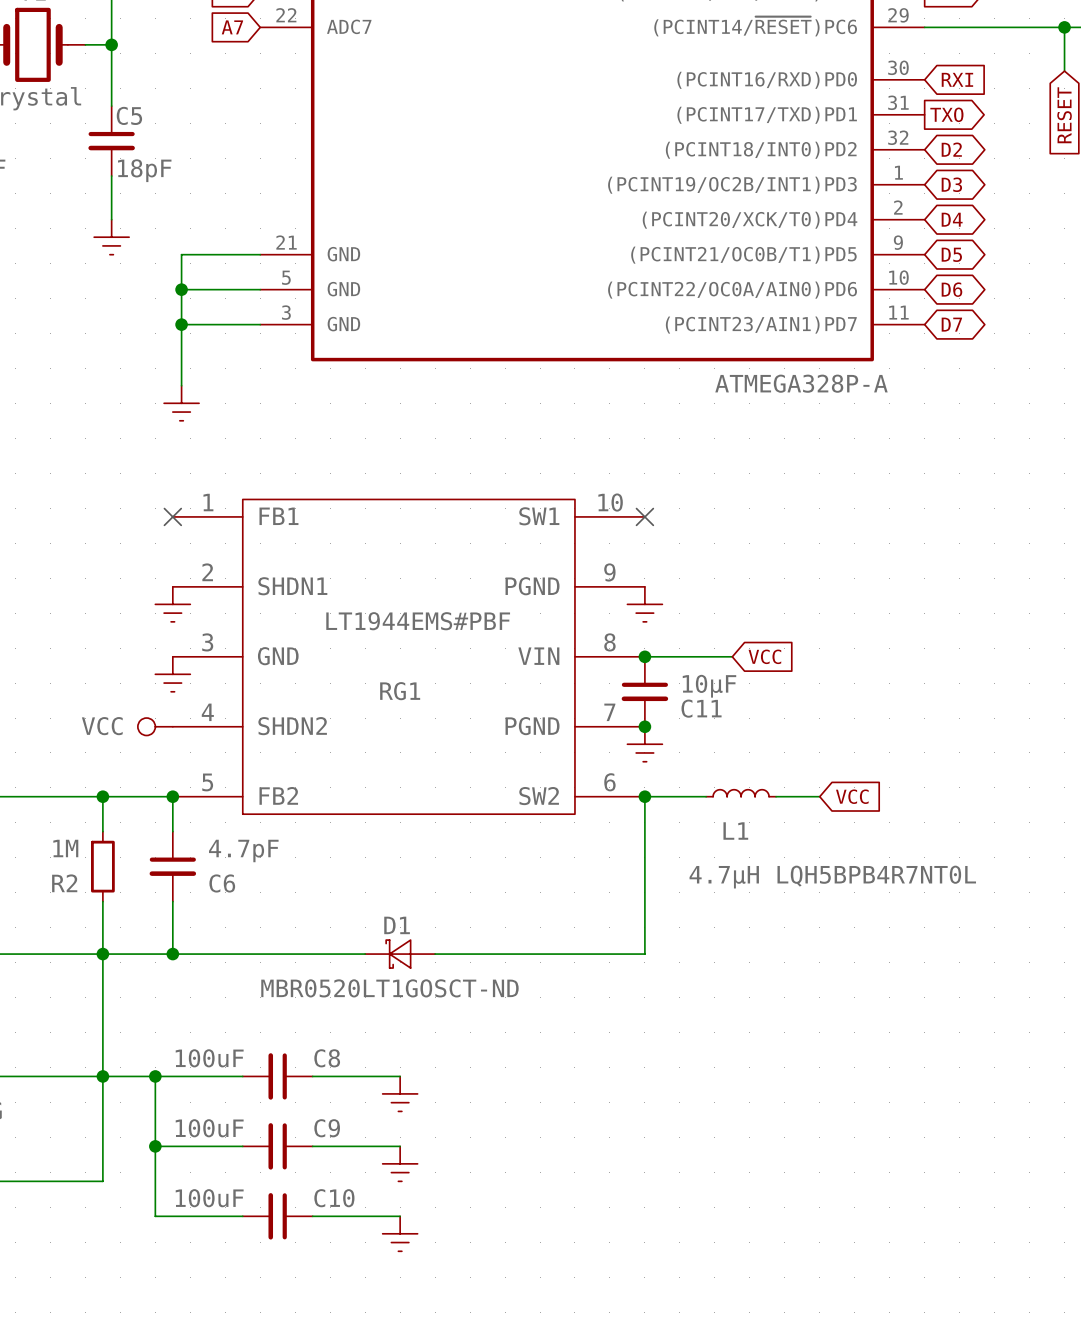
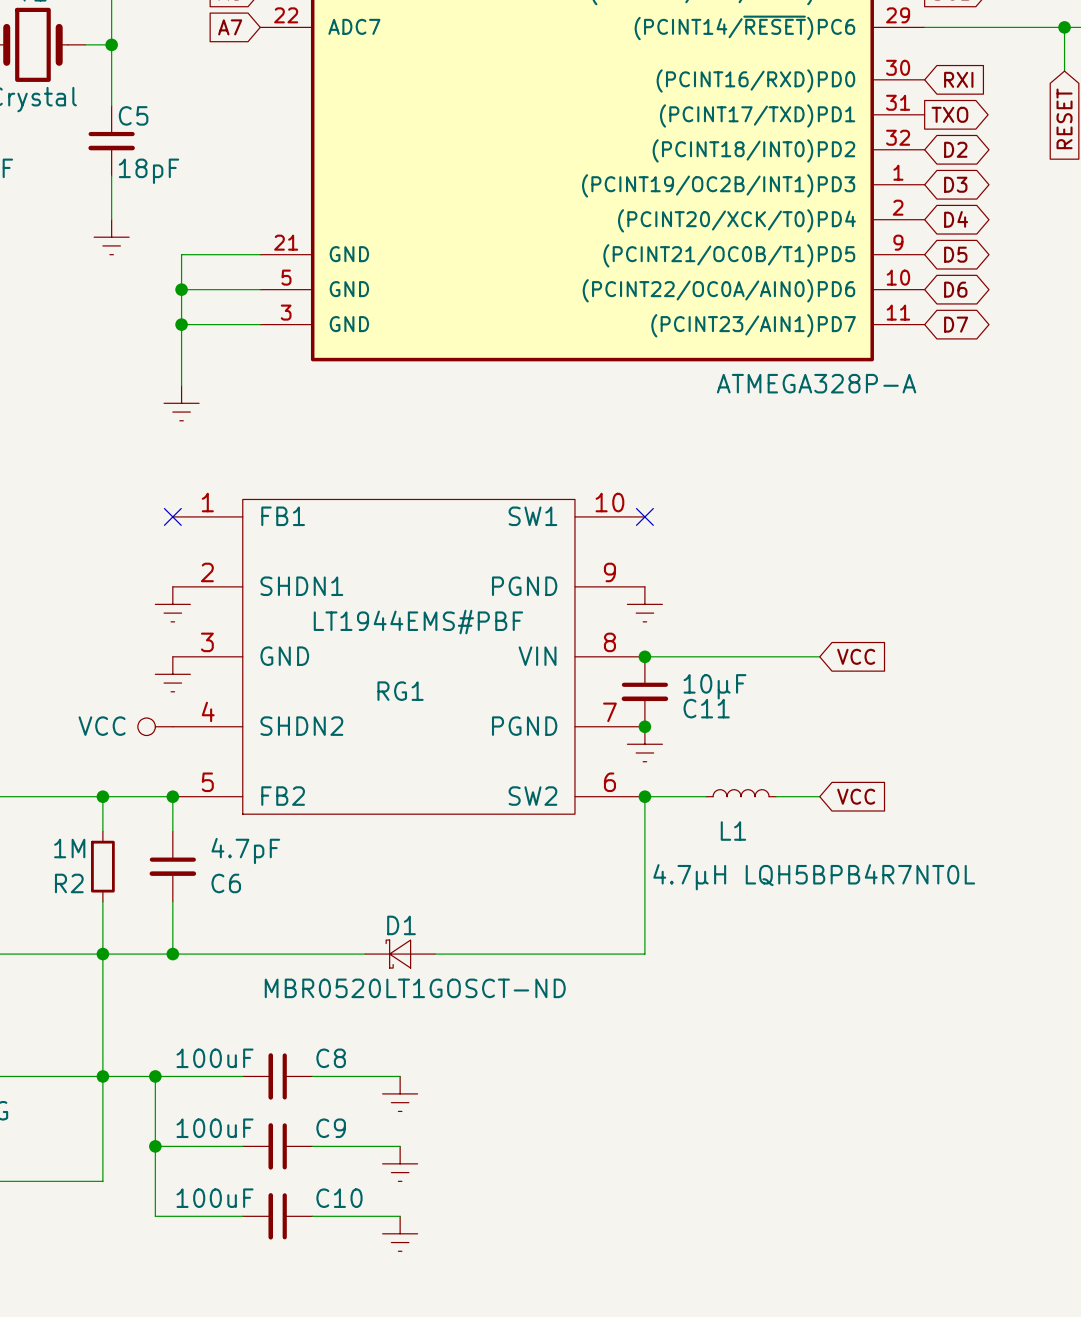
wire: none -> (732, 656) (819, 656)
global label position: VCC (764, 656) -> VCC (856, 656)

